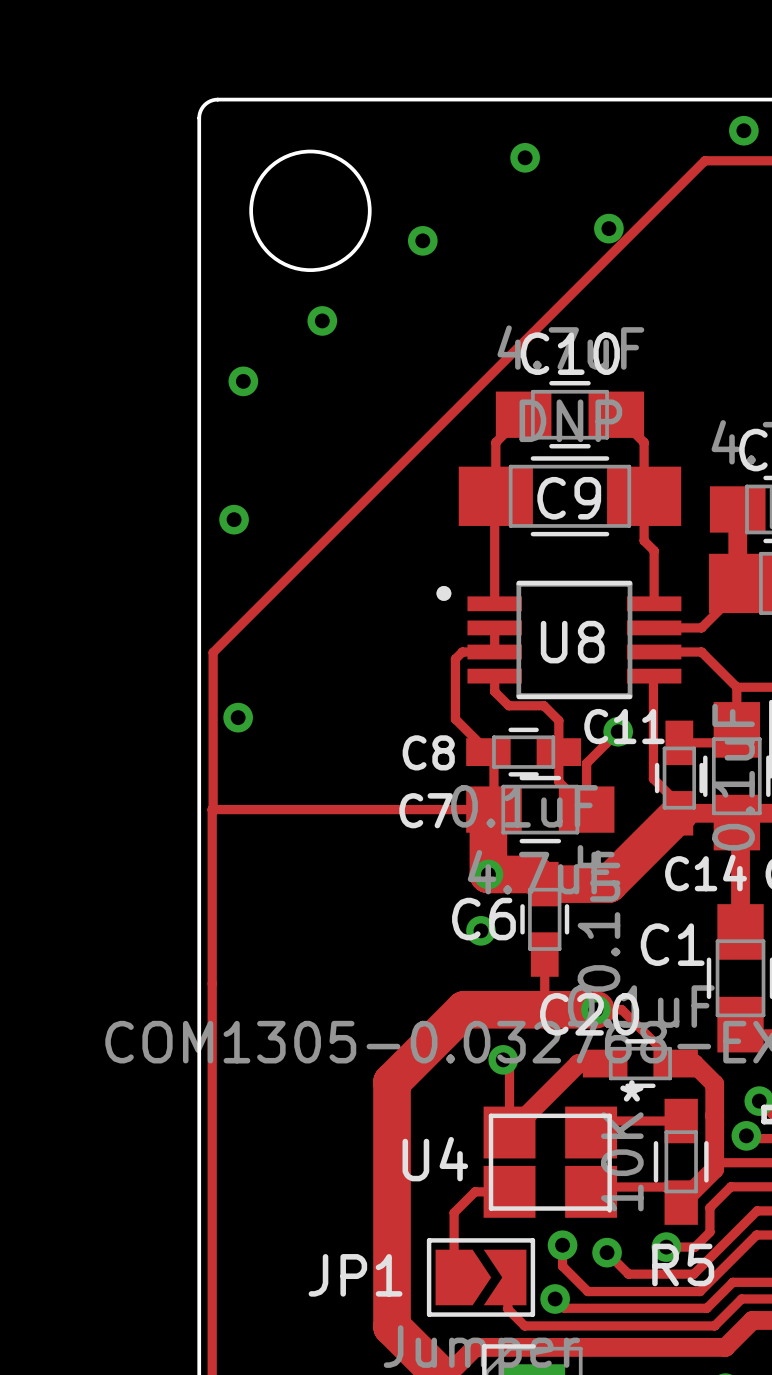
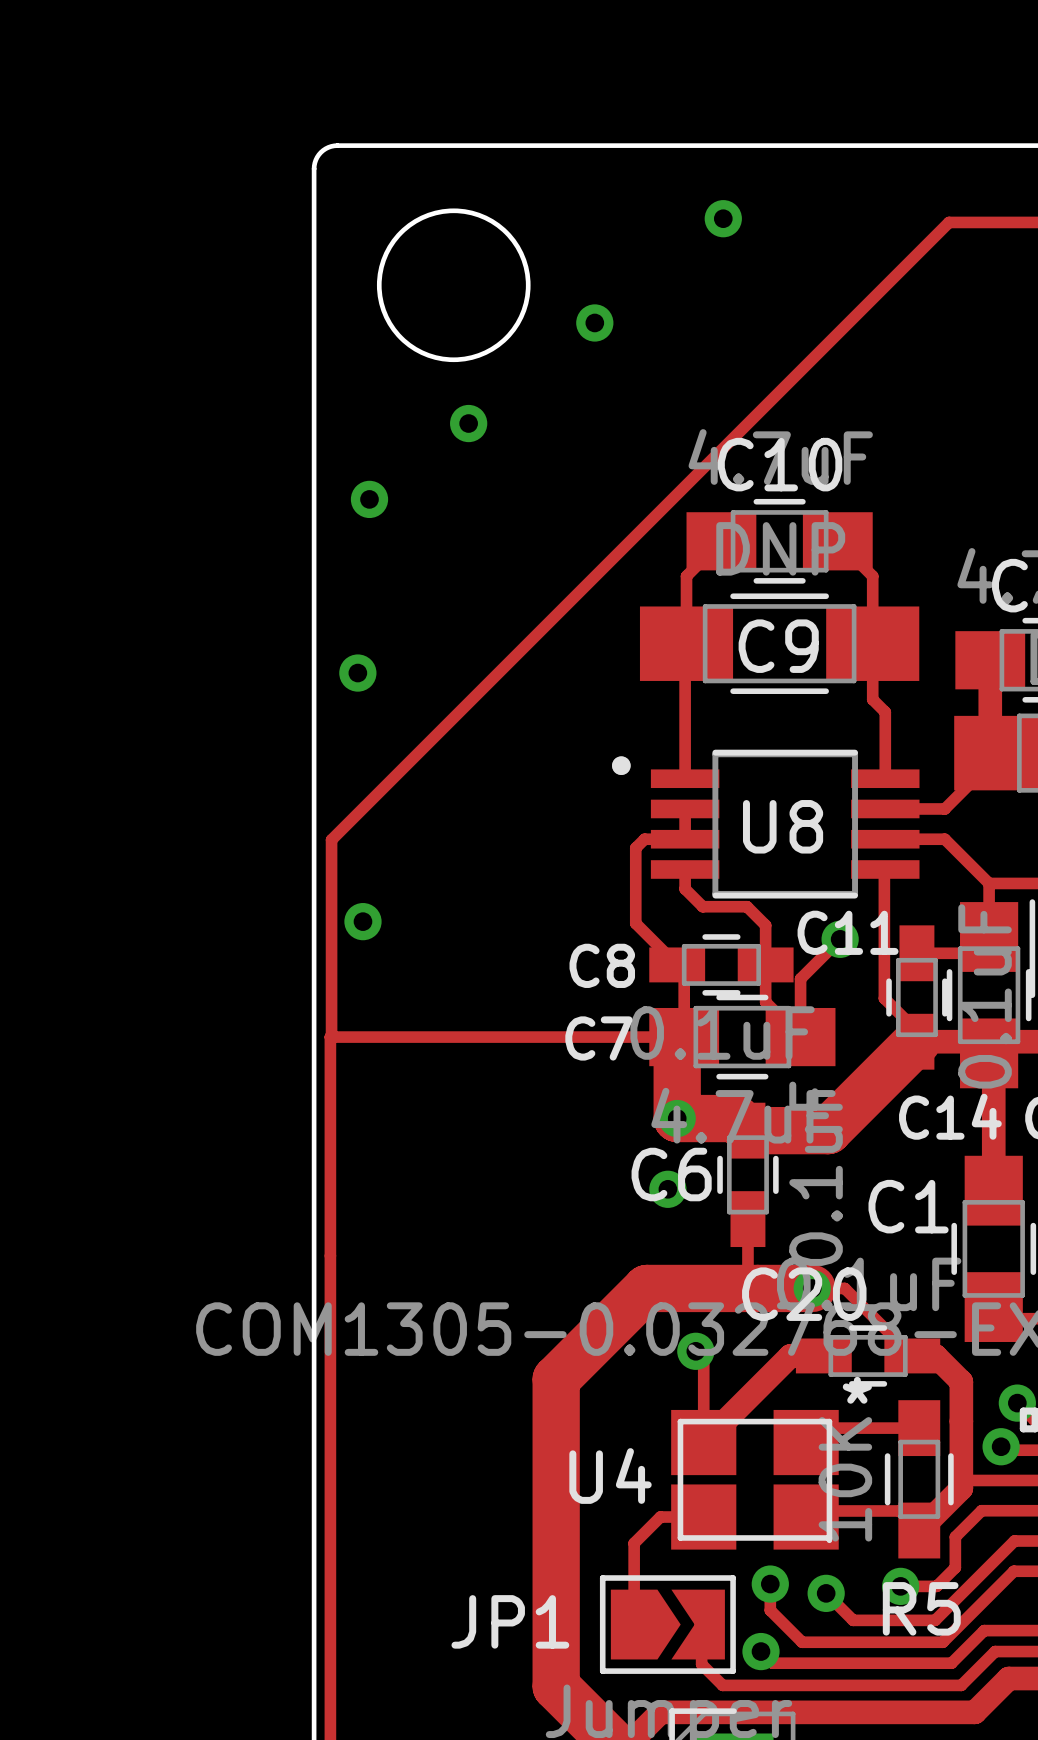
via: (743, 130) -> none
via: (608, 228) -> none

